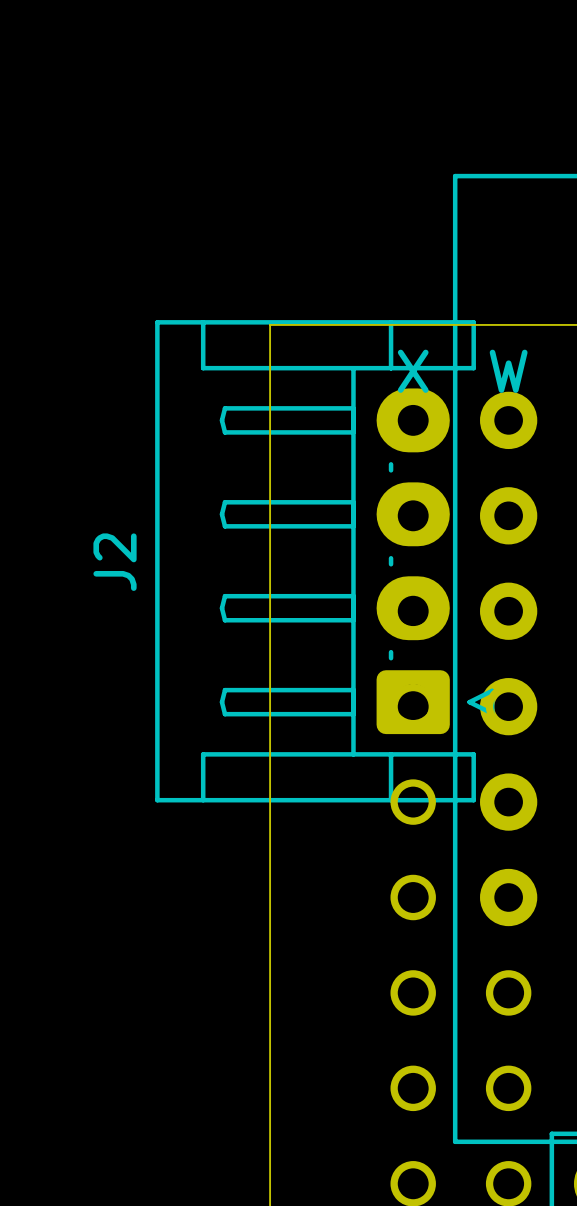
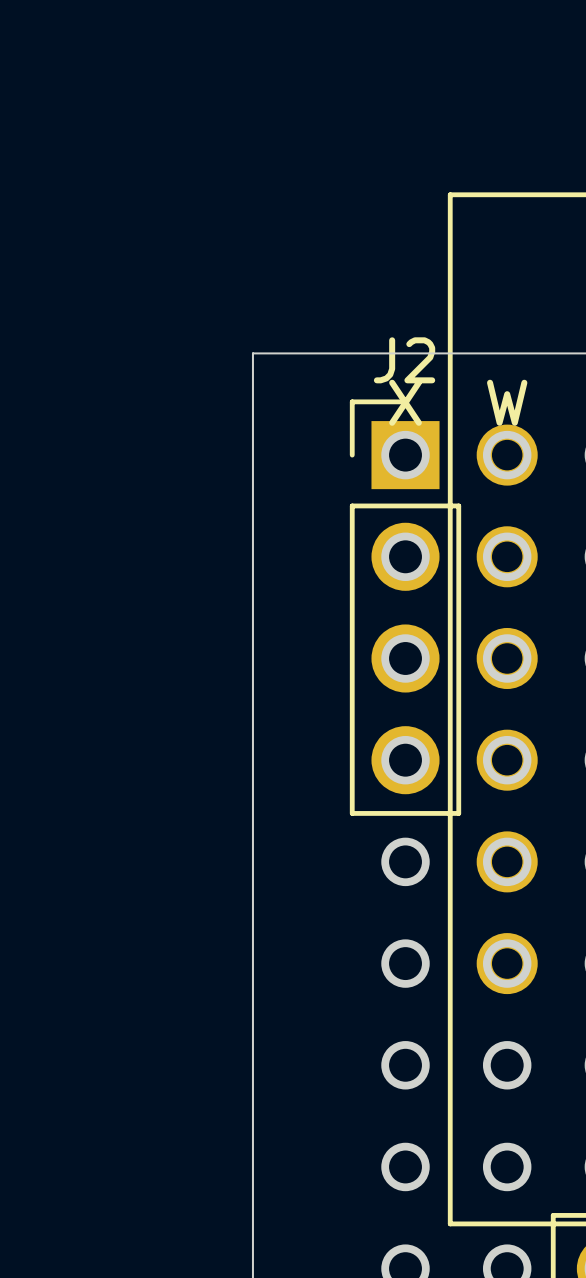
J2 footprint: [155, 320, 495, 803] -> [349, 399, 462, 816]
J2 name position: J2 (115, 562) -> J2 (404, 360)

